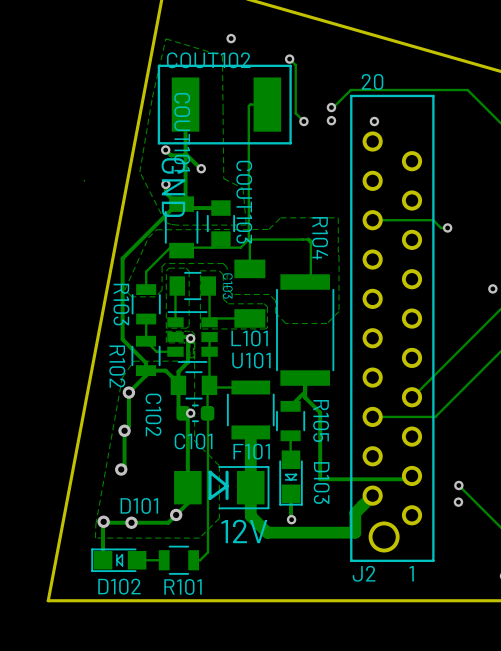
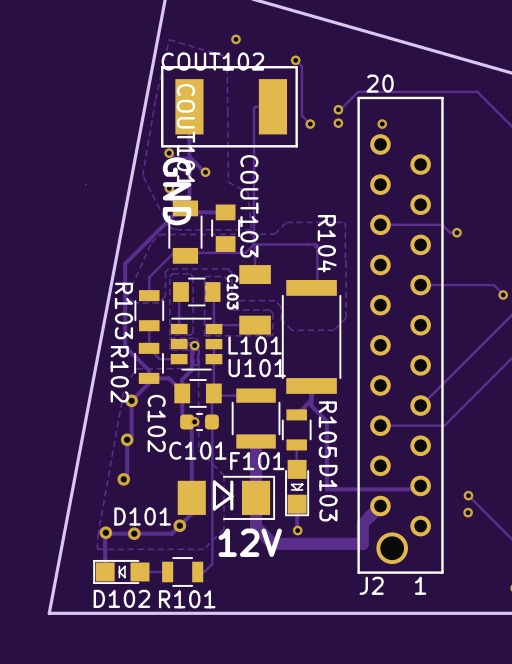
track: none -> (420, 285) (493, 285) (501, 292)

